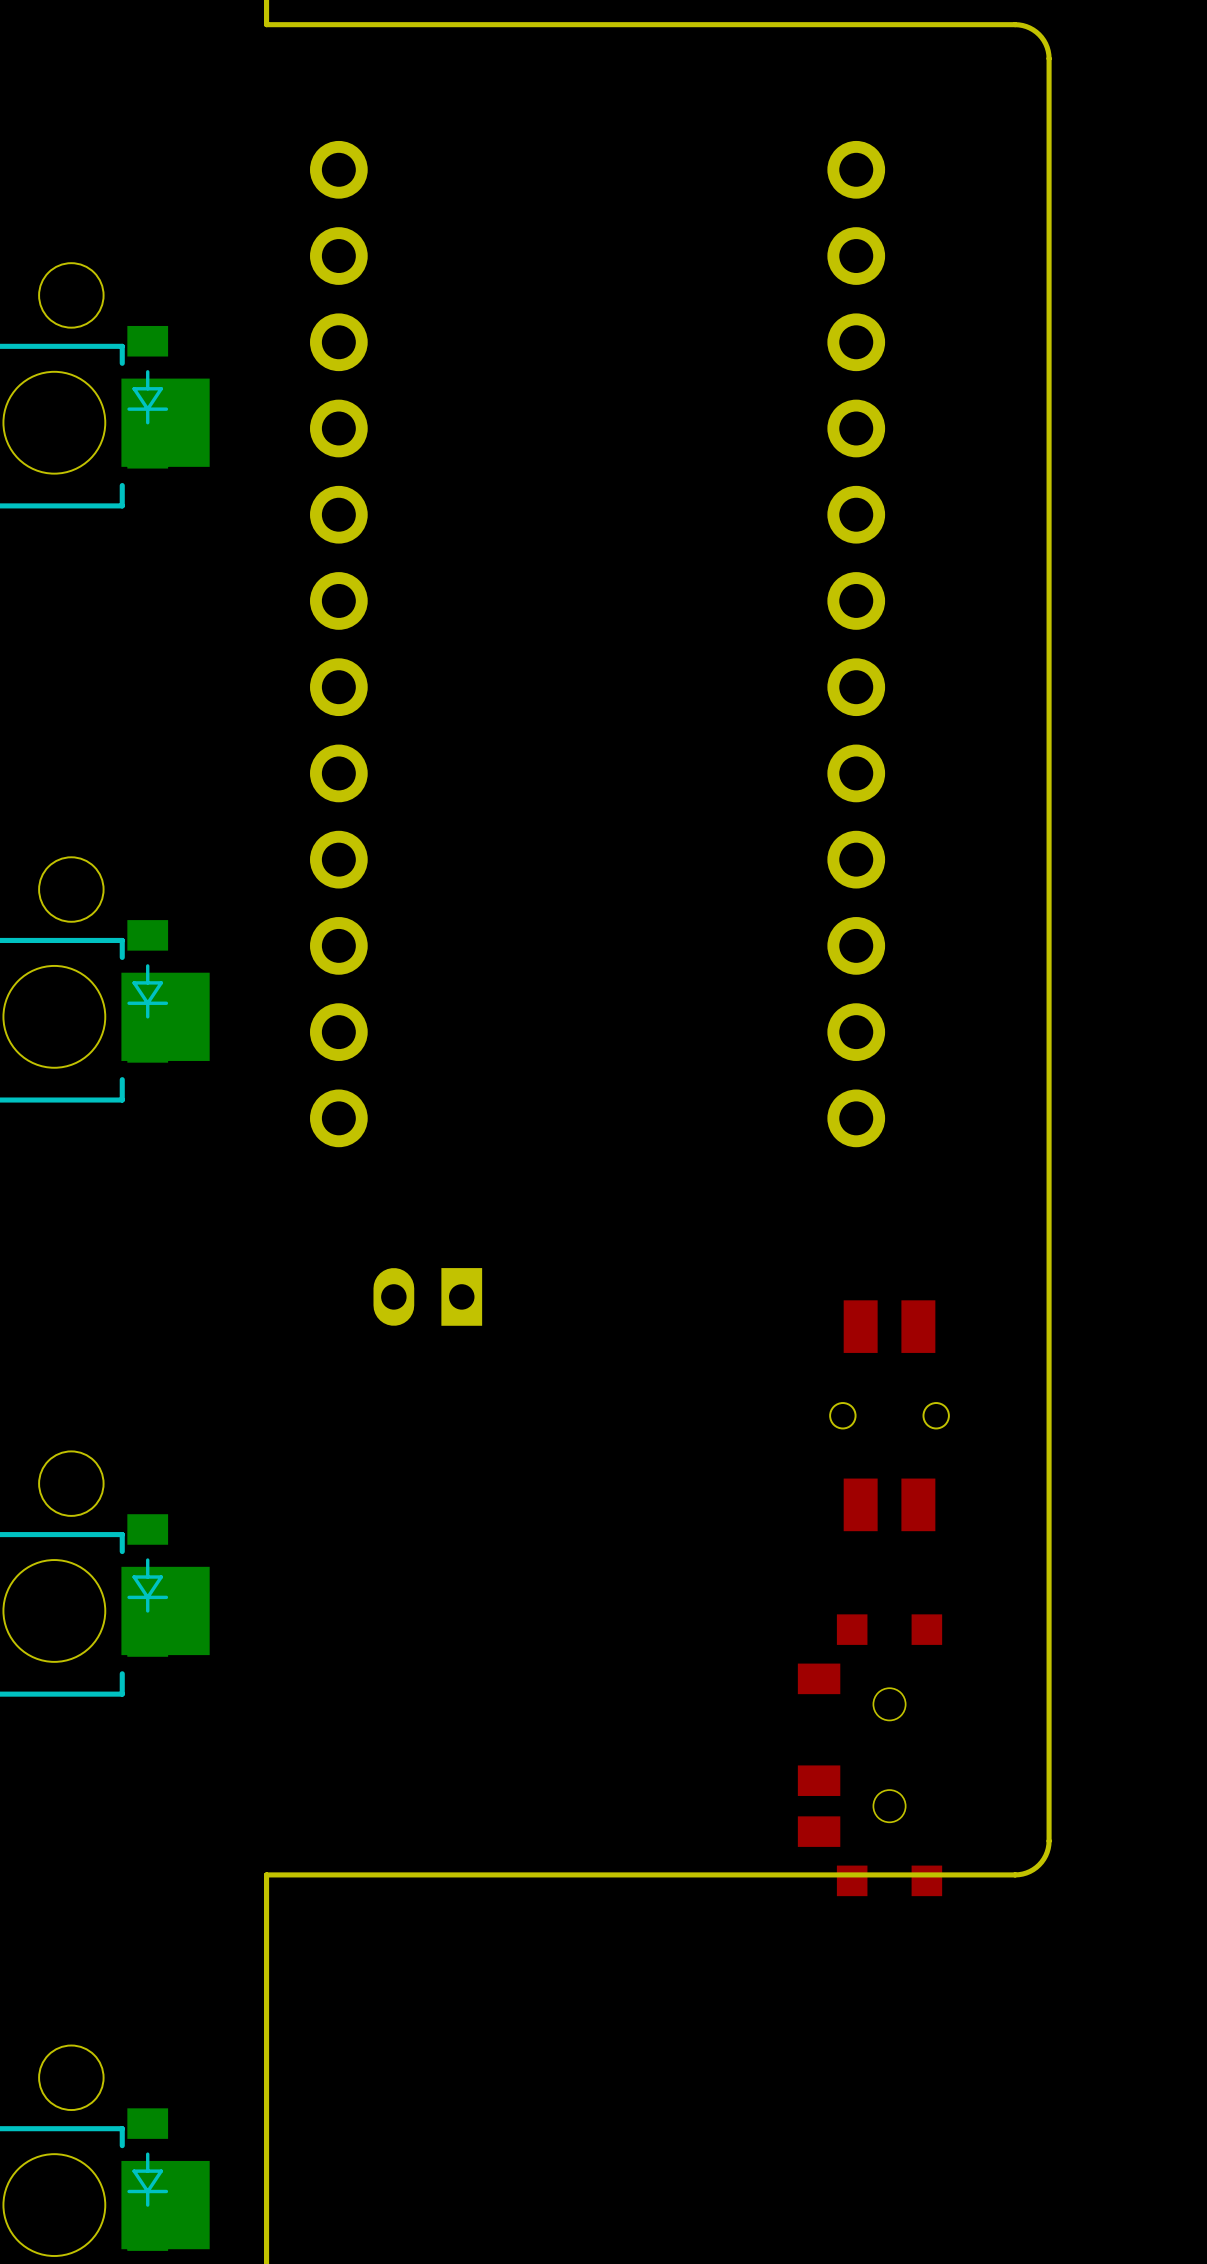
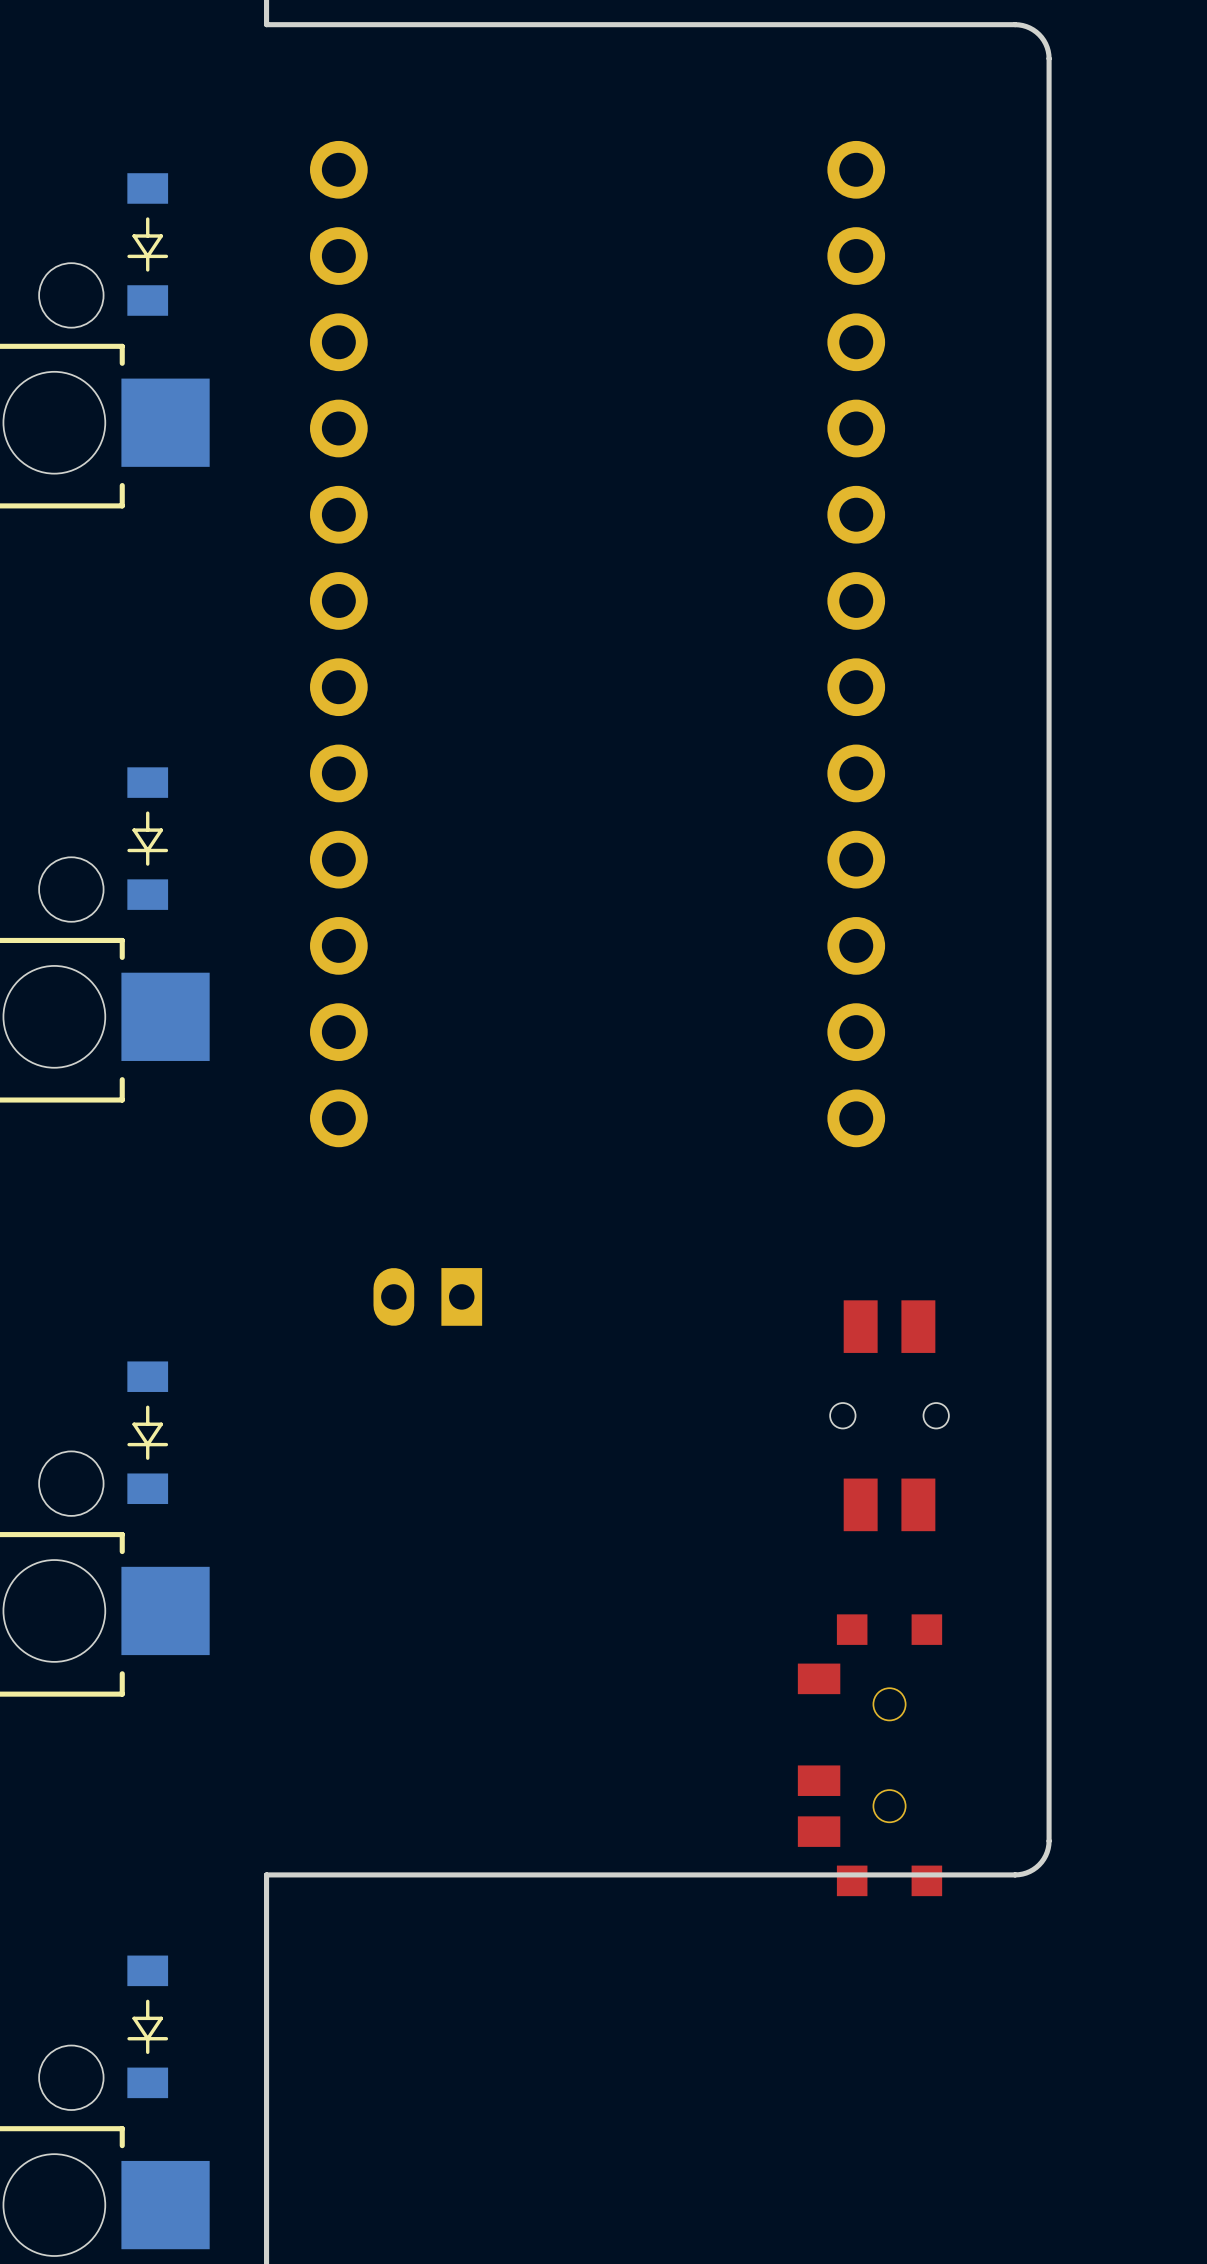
part position: (147, 397) -> (147, 244)
part position: (147, 991) -> (147, 838)
part position: (147, 1585) -> (147, 1432)
part position: (147, 2179) -> (147, 2026)

